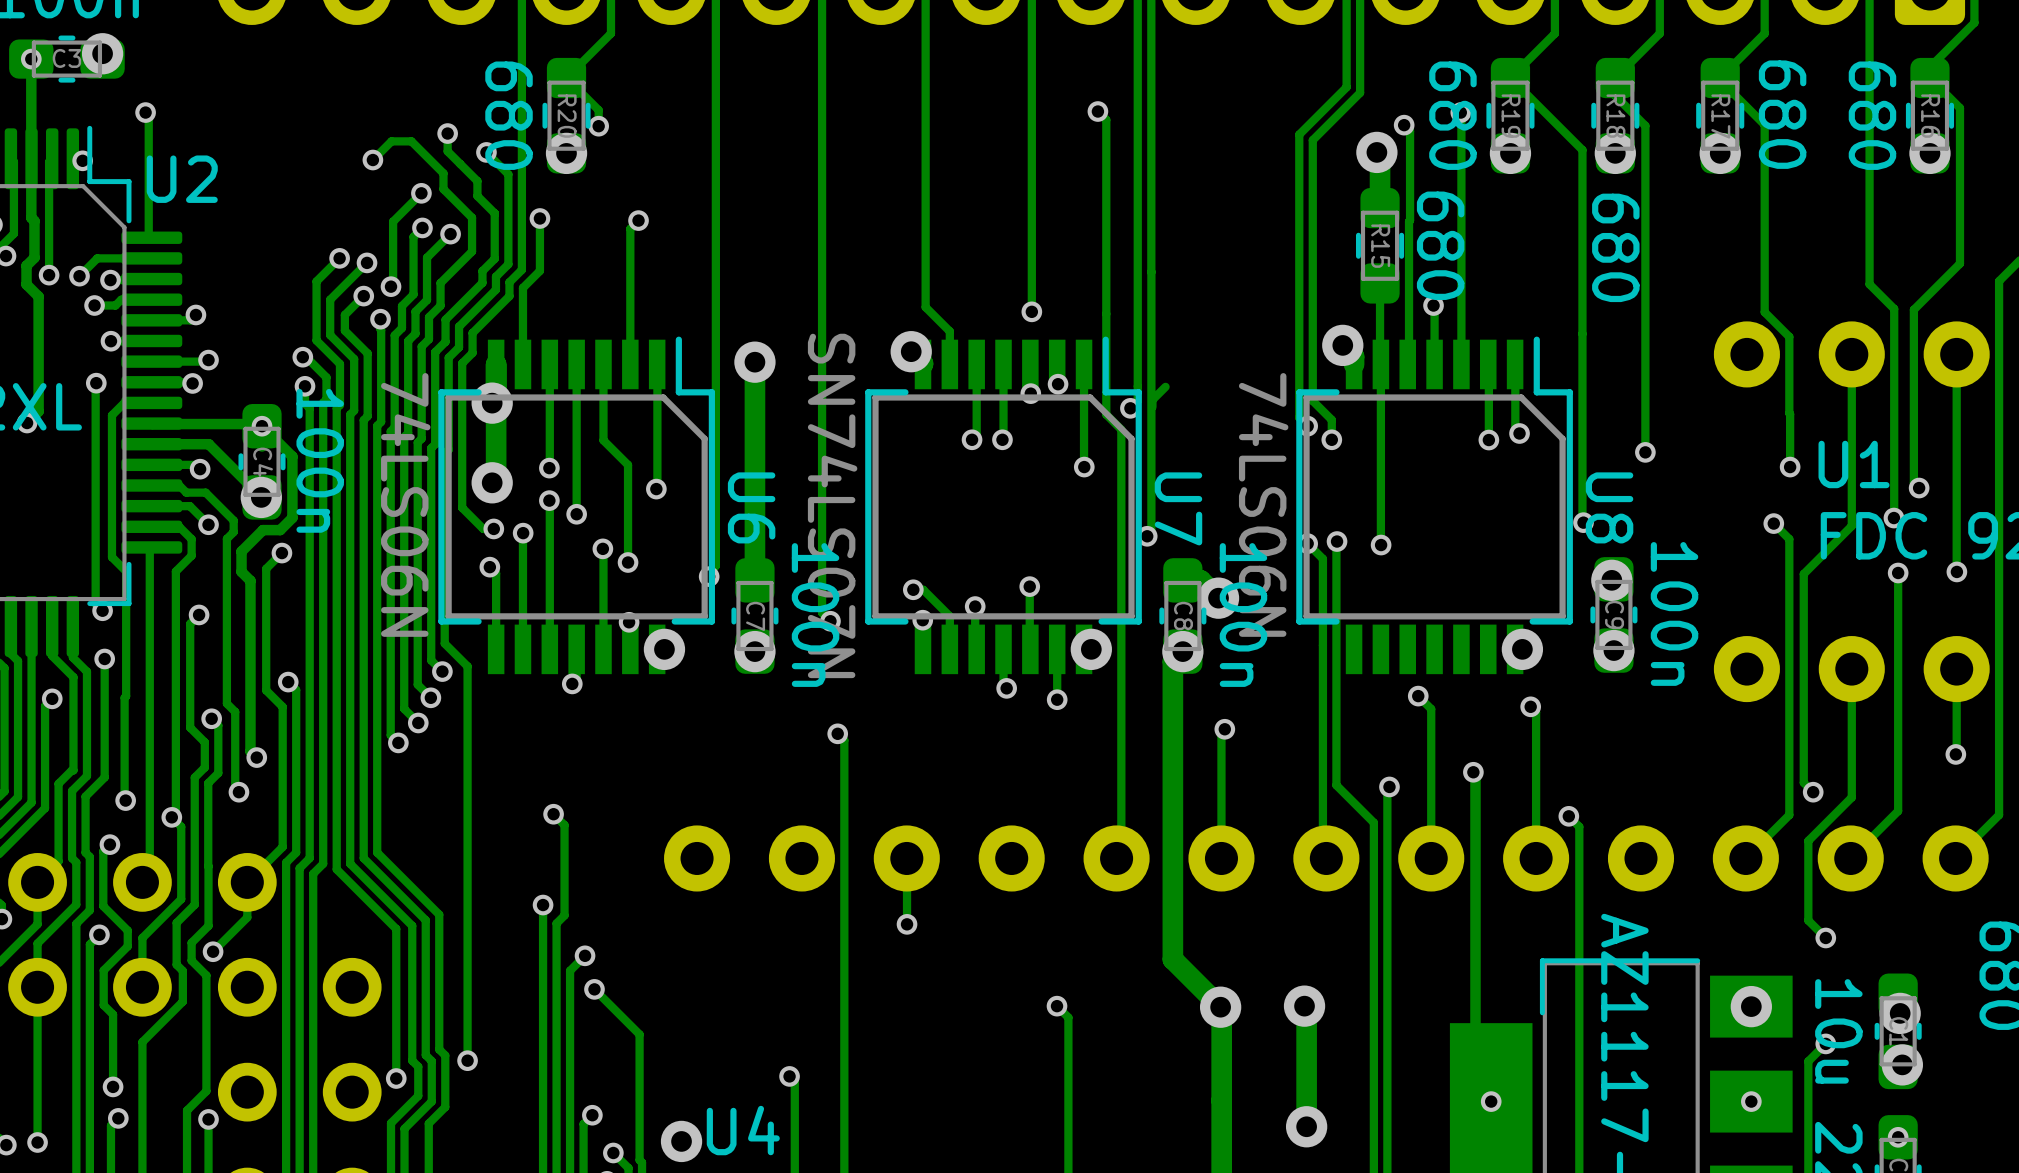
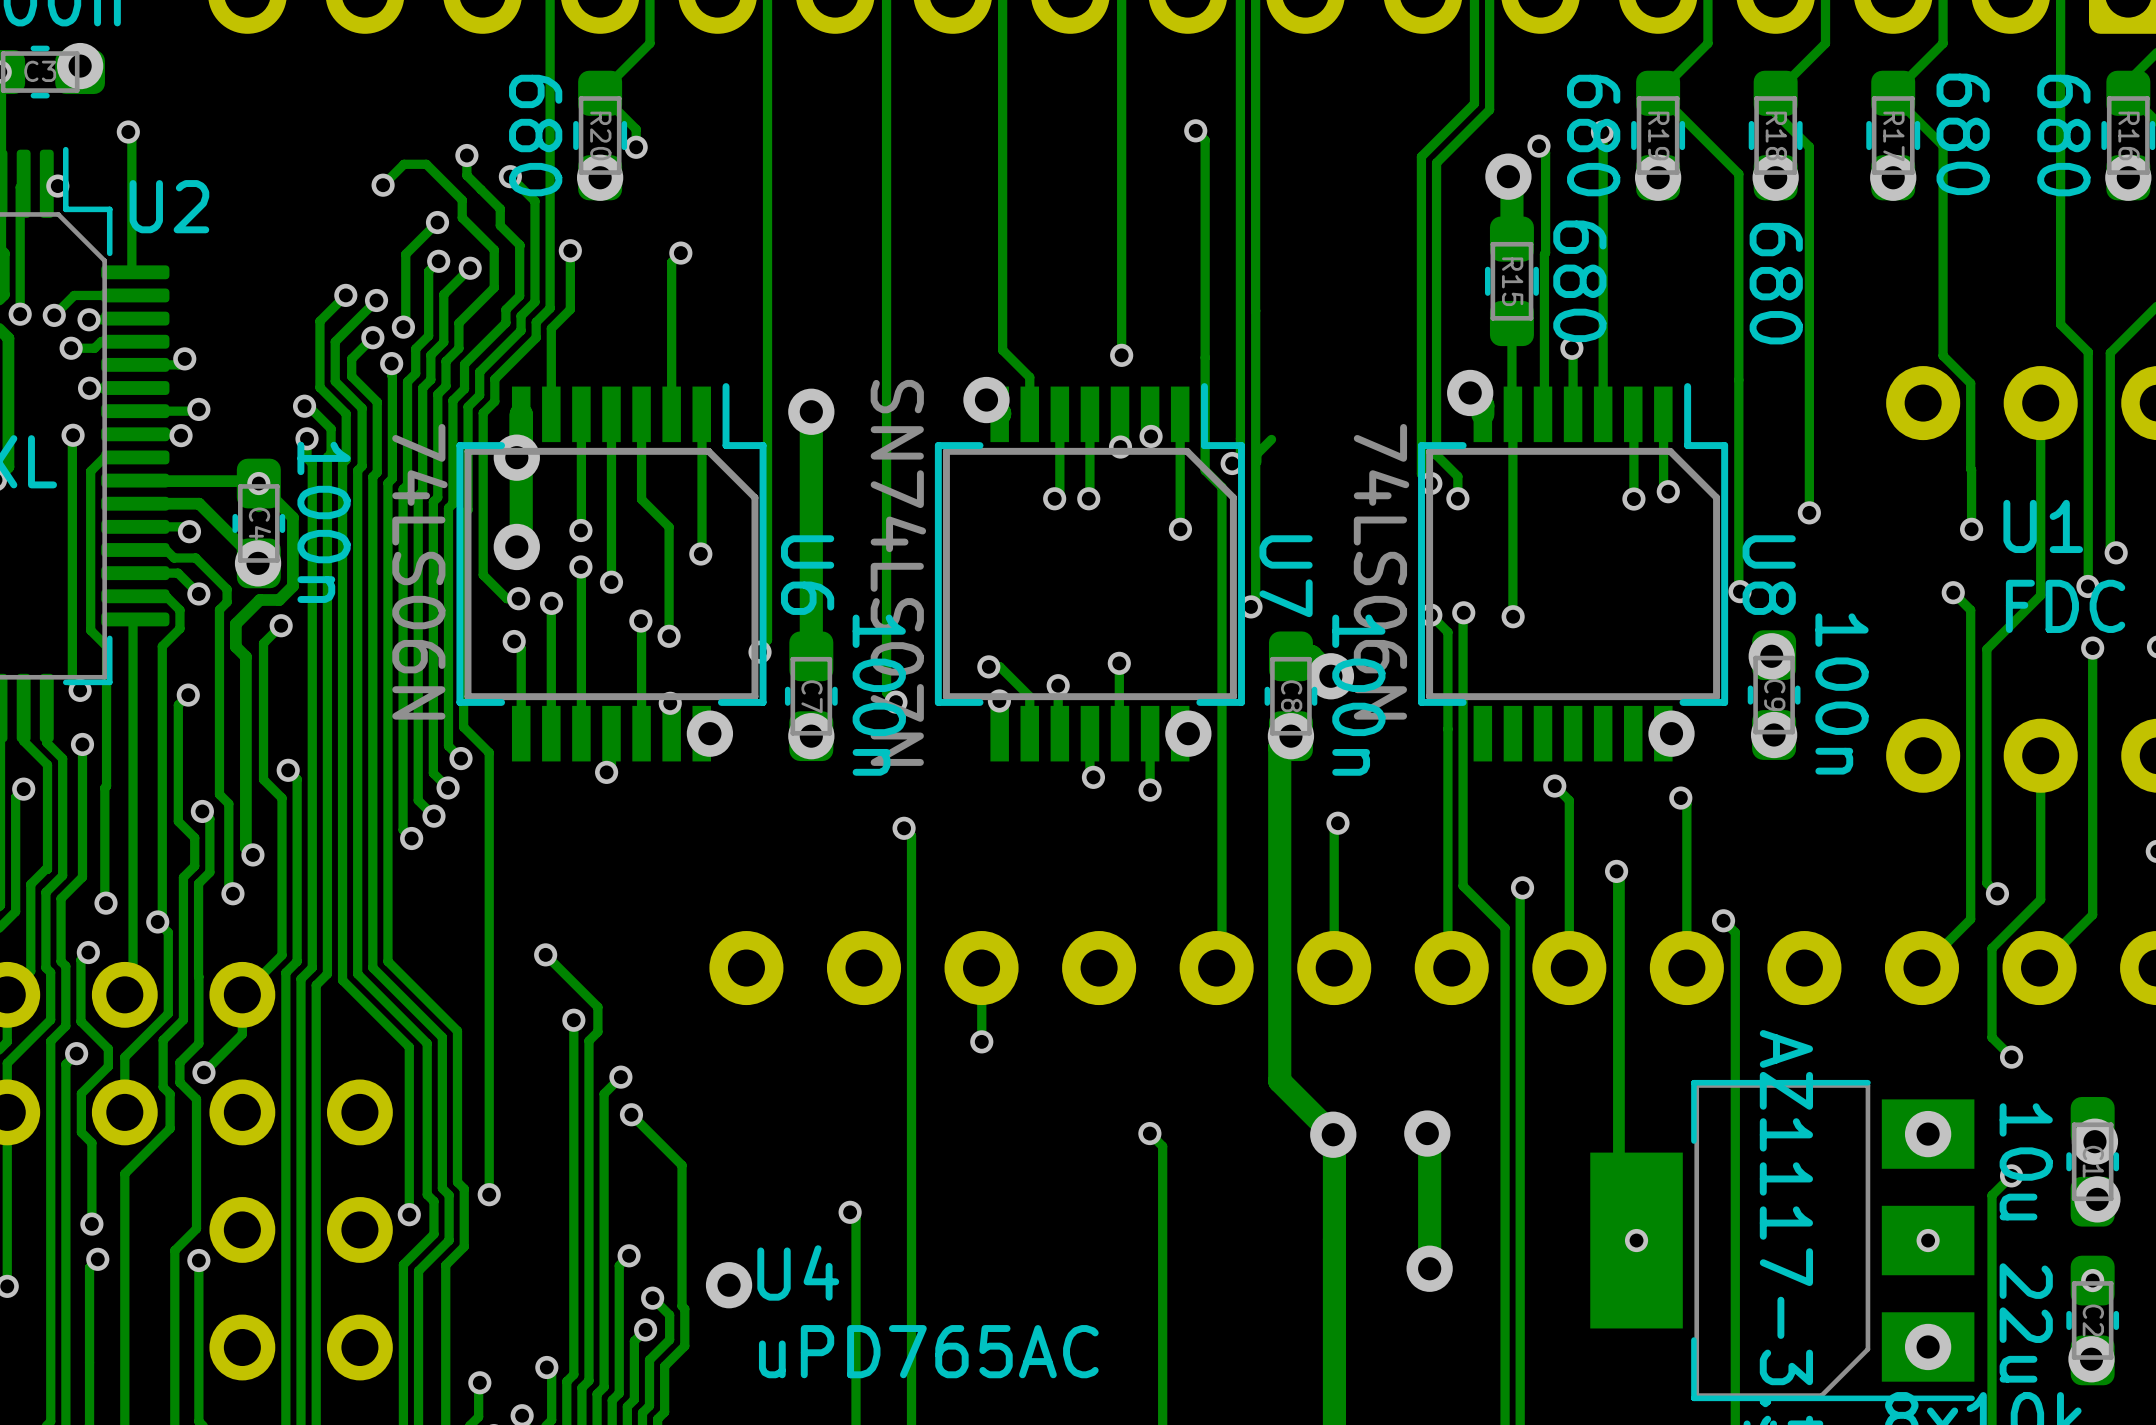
track: (553, 814) (564, 825) (564, 893) -> (545, 954) (597, 1007)
via position: (553, 814) -> (545, 954)

